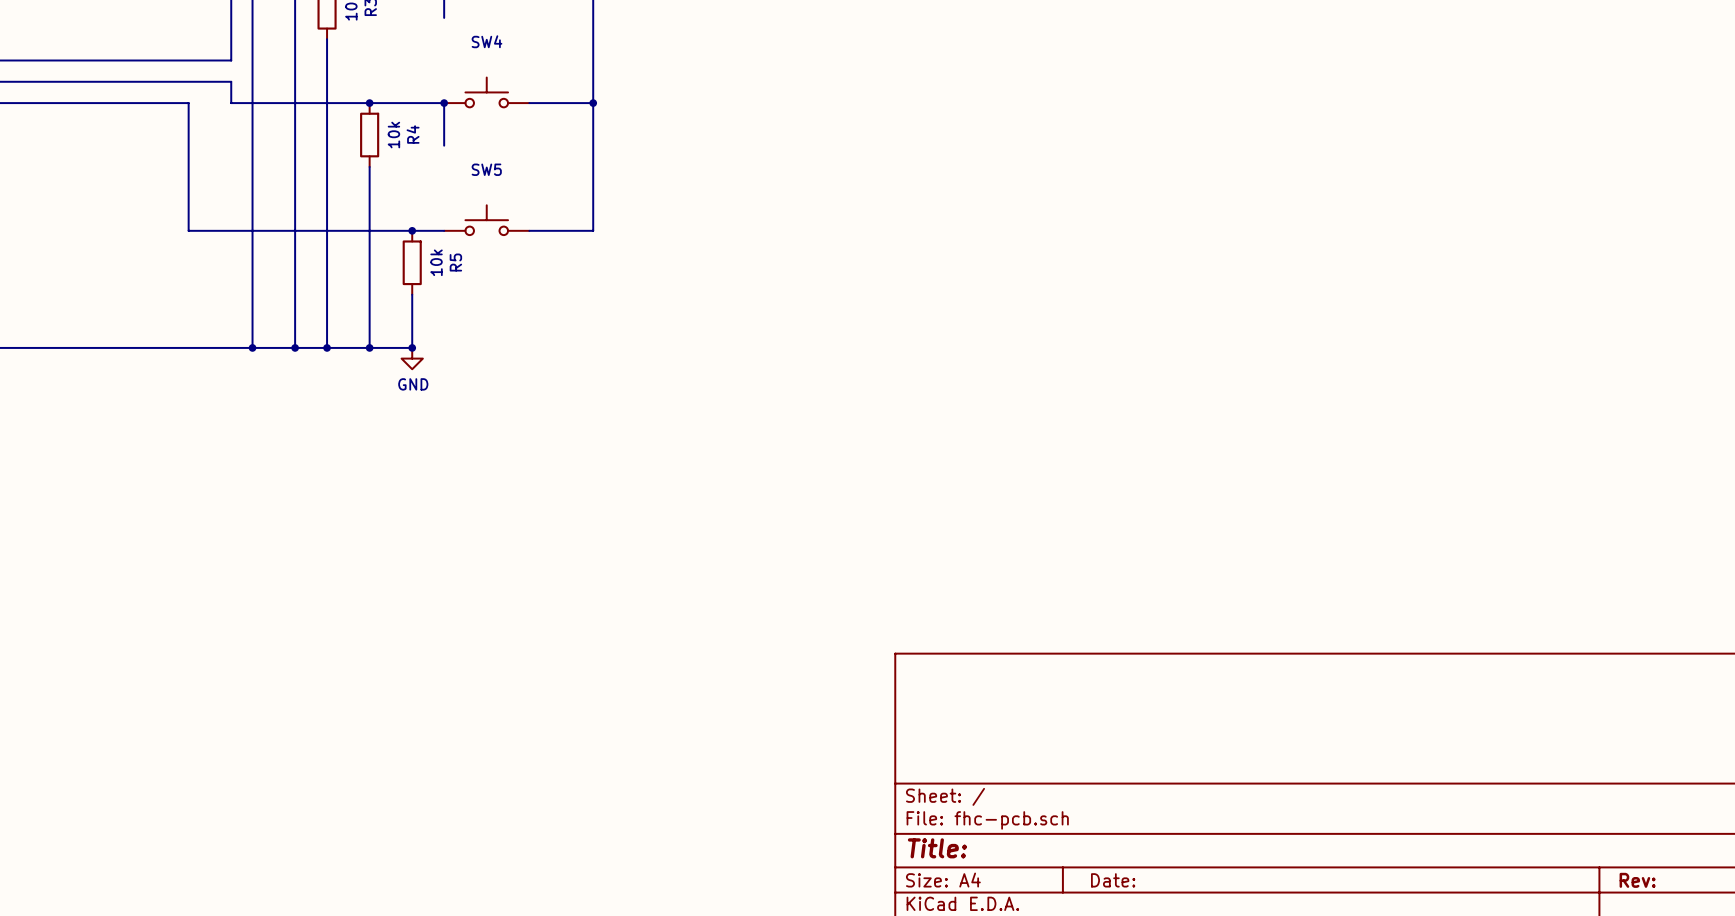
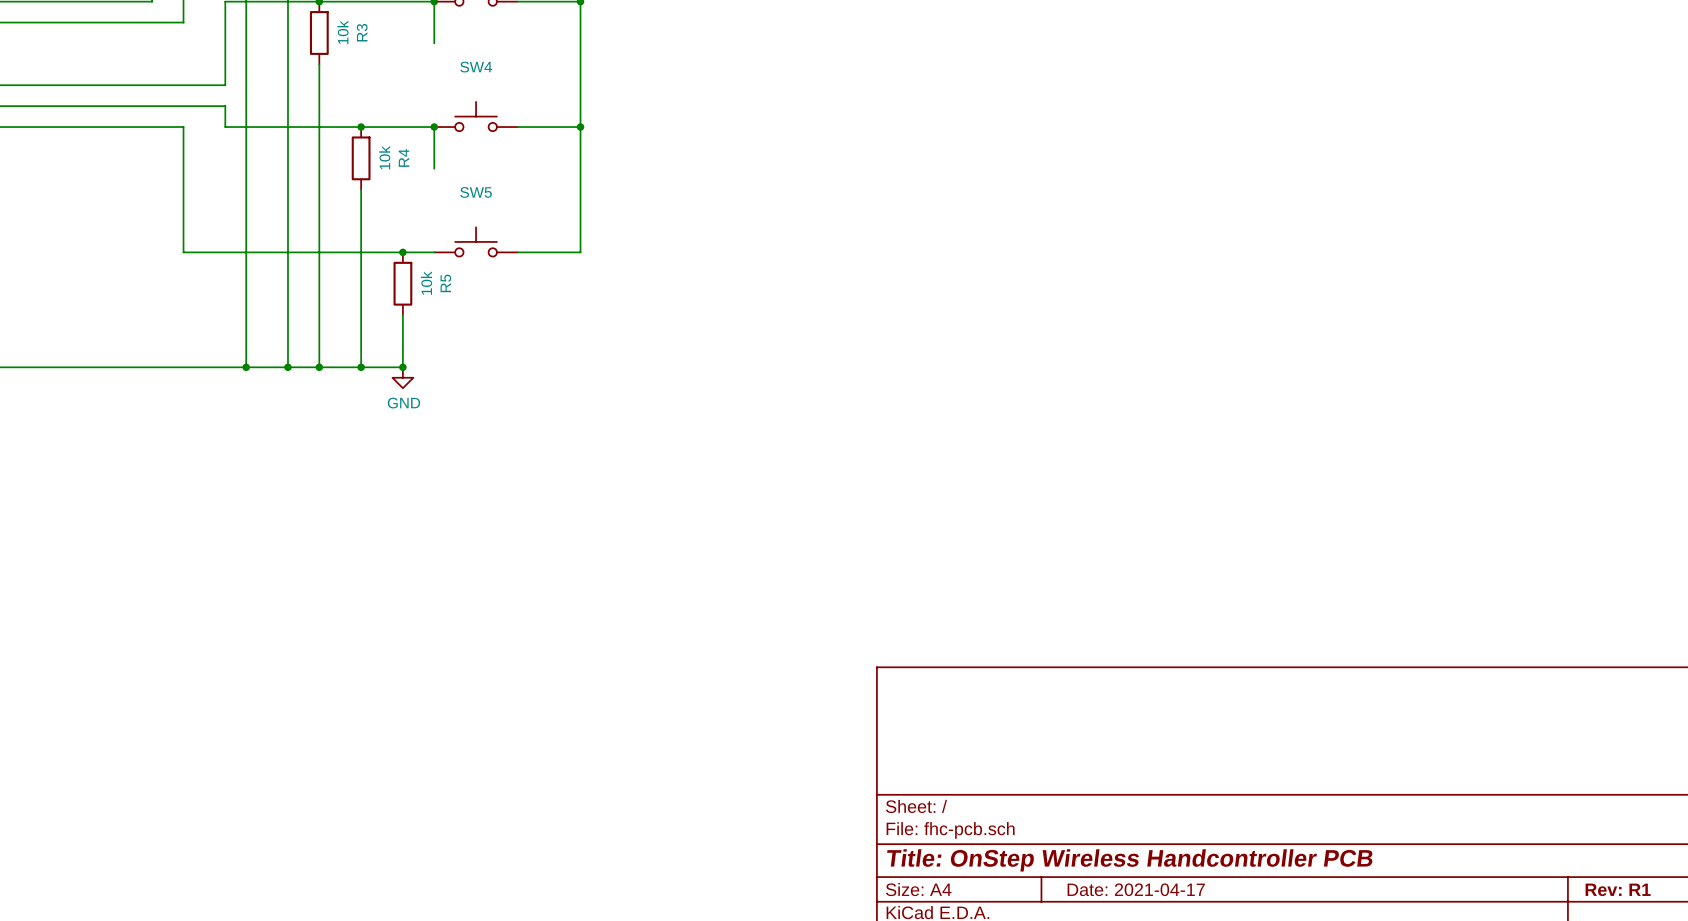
title block: Title: (937, 848) -> Title: OnStep Wireless Handcontroller PCB (1129, 860)
title block: Date: (1113, 880) -> Date: 2021-04-17 (1136, 889)
title block: Rev: (1637, 880) -> Rev: R1 (1618, 889)

